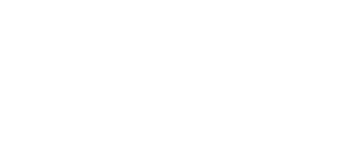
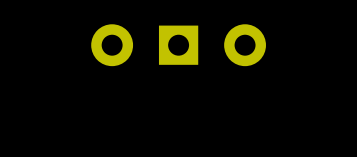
part: none -> (178, 45)

